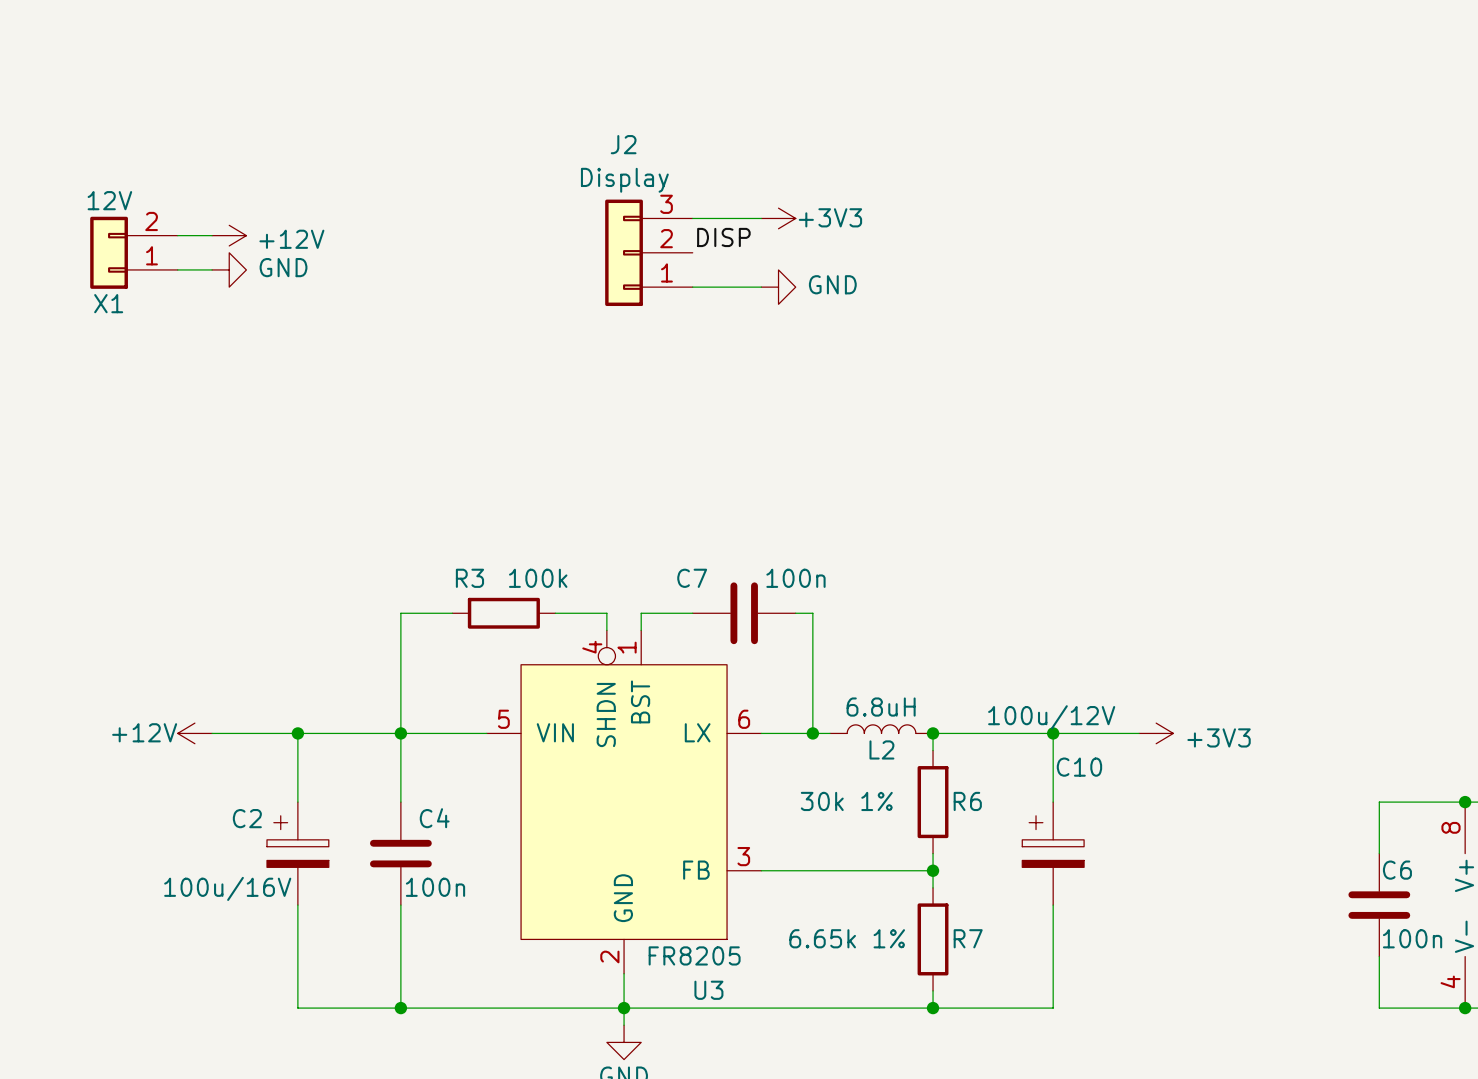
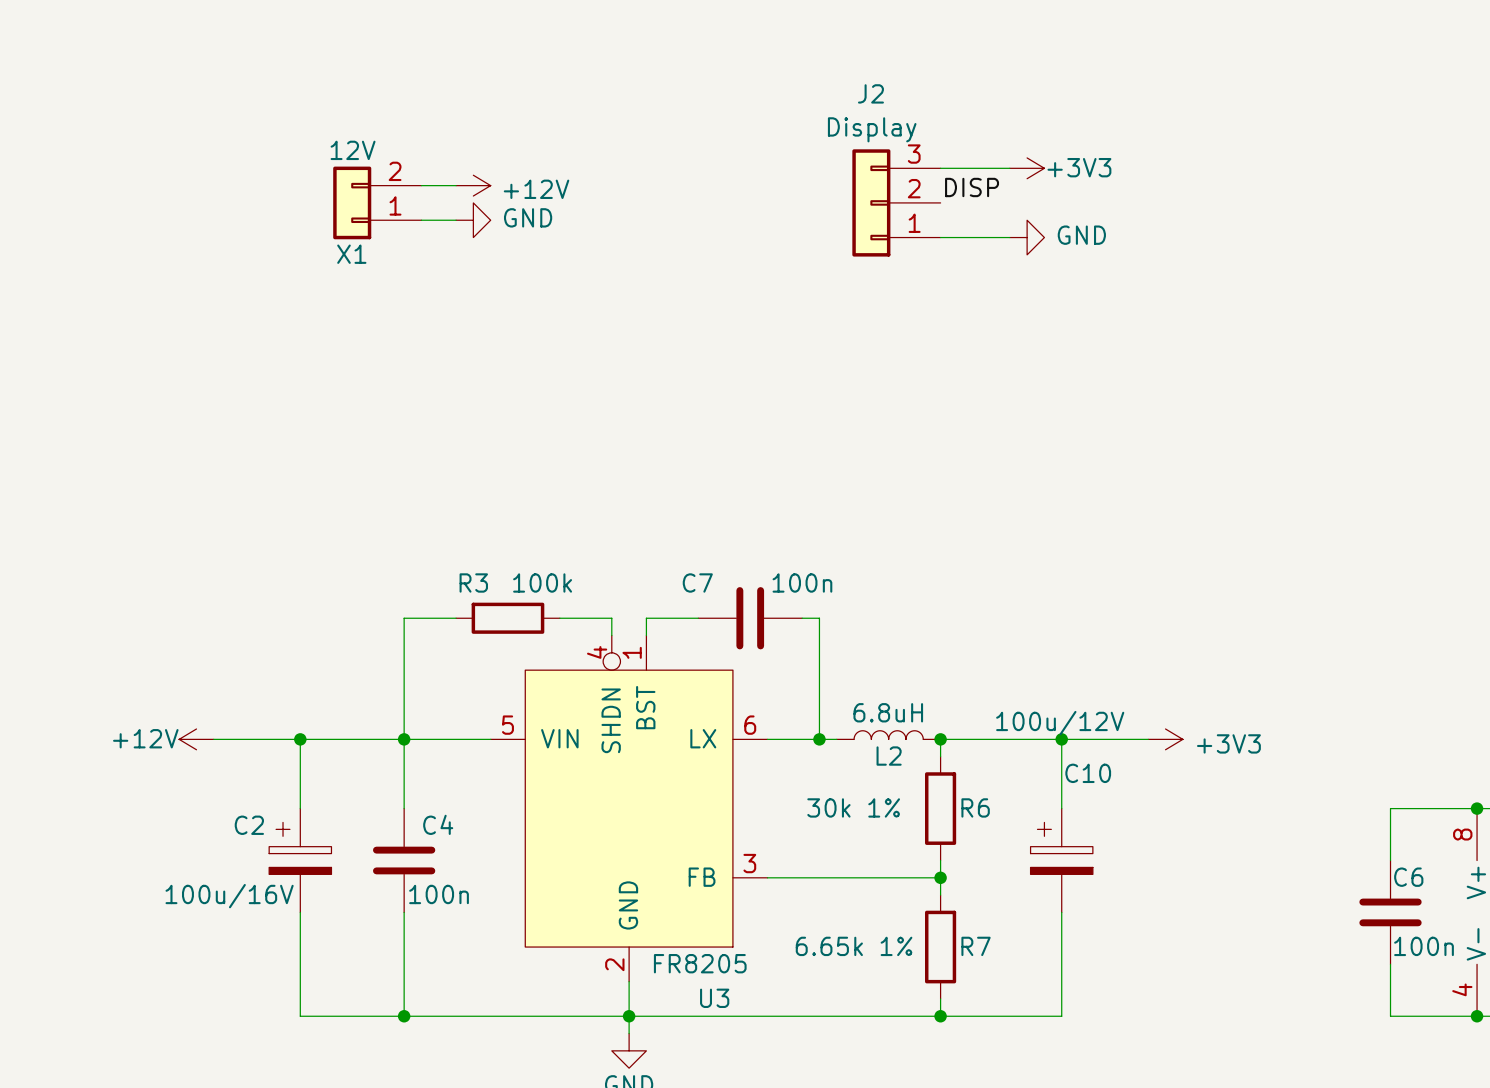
power symbol: none -> GND (473, 220)
wire: (692, 218) (761, 218) -> (940, 168) (1009, 168)
power symbol position: +3V3 (778, 218) -> +3V3 (1027, 168)
wire: (177, 235) (212, 235) -> (421, 185) (456, 185)
power symbol position: +12V (229, 235) -> +12V (473, 185)
power symbol: none -> GND (1027, 237)
label position: DISP (723, 237) -> DISP (972, 187)
X1 position: (133, 252) -> (377, 202)
J2 position: (648, 252) -> (896, 202)
wire: (177, 269) (212, 269) -> (421, 220) (456, 220)
power symbol: GND (229, 269) -> none
wire: (692, 287) (761, 287) -> (940, 237) (1009, 237)
power symbol: GND (778, 287) -> none

